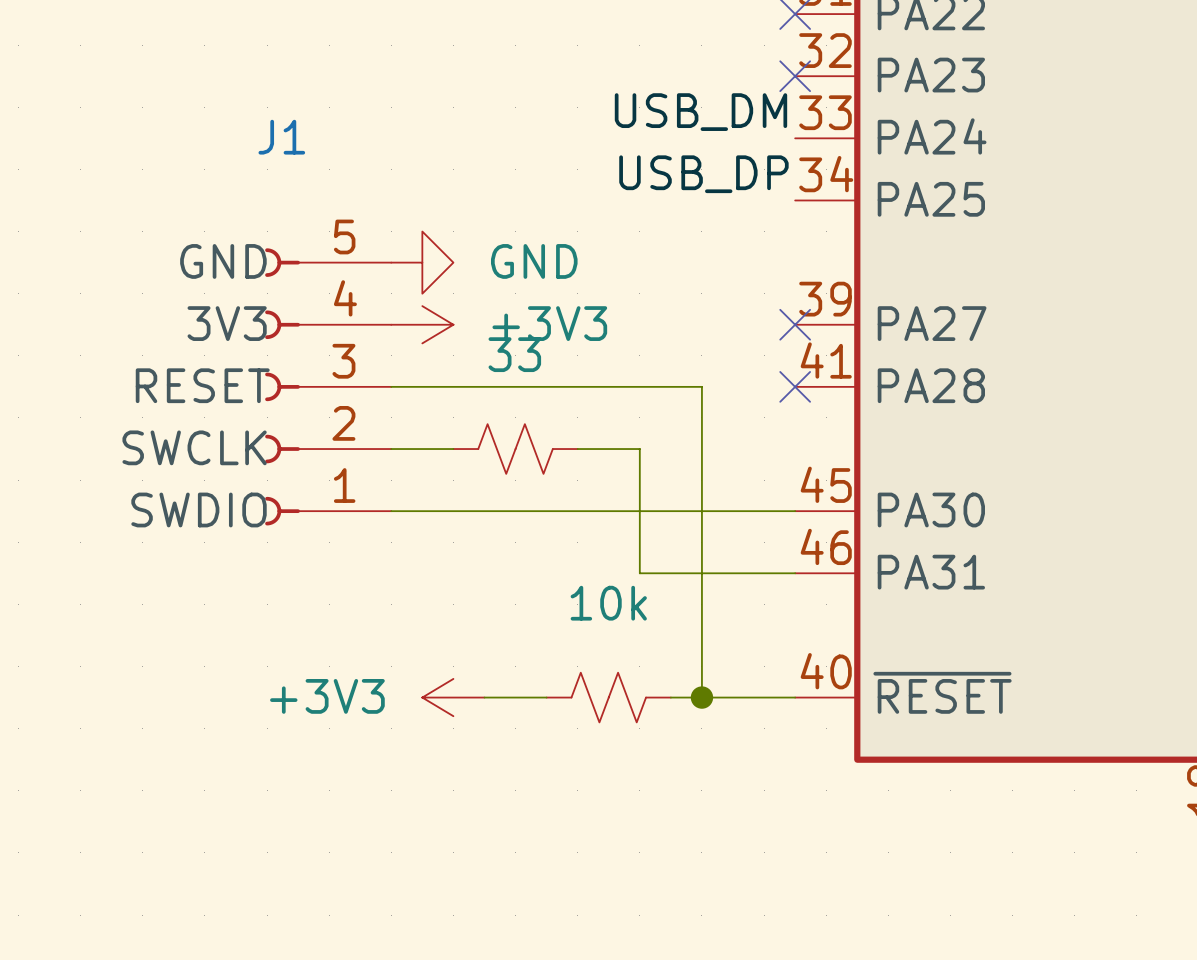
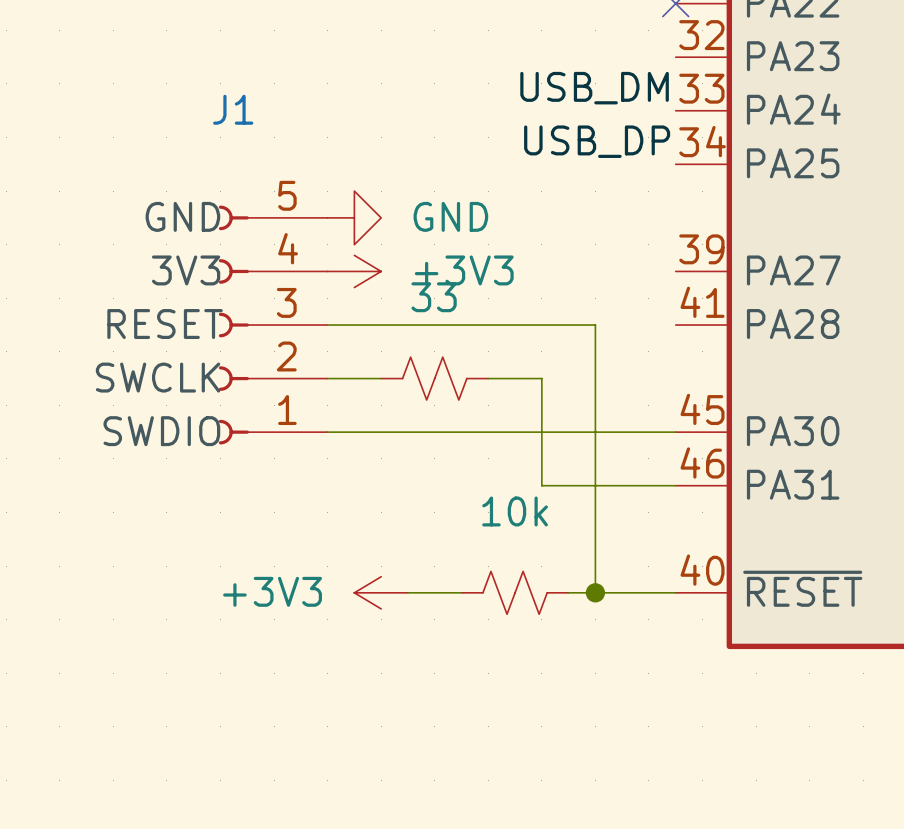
no-connect mark: (795, 76) -> none
no-connect mark: (795, 324) -> none
no-connect mark: (795, 386) -> none

